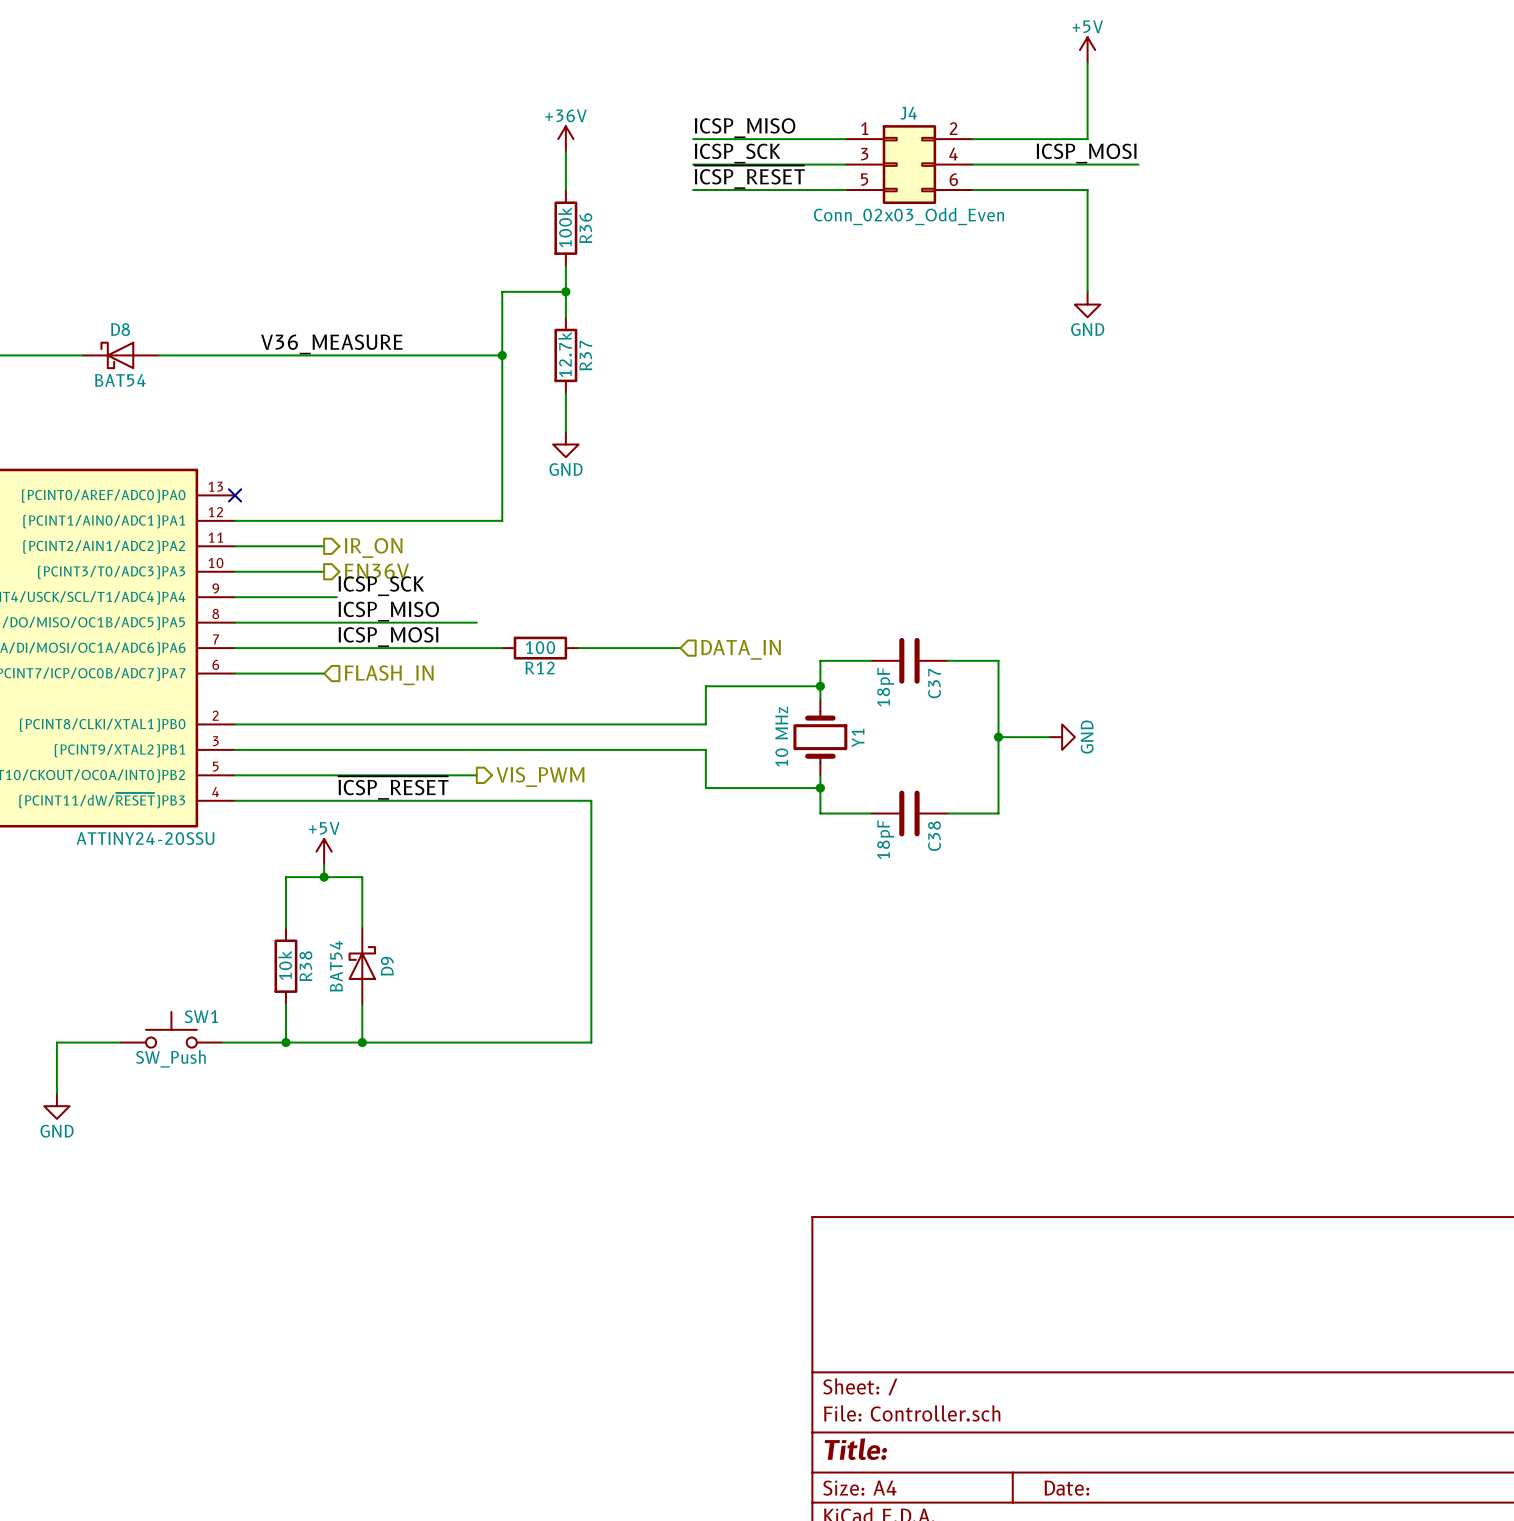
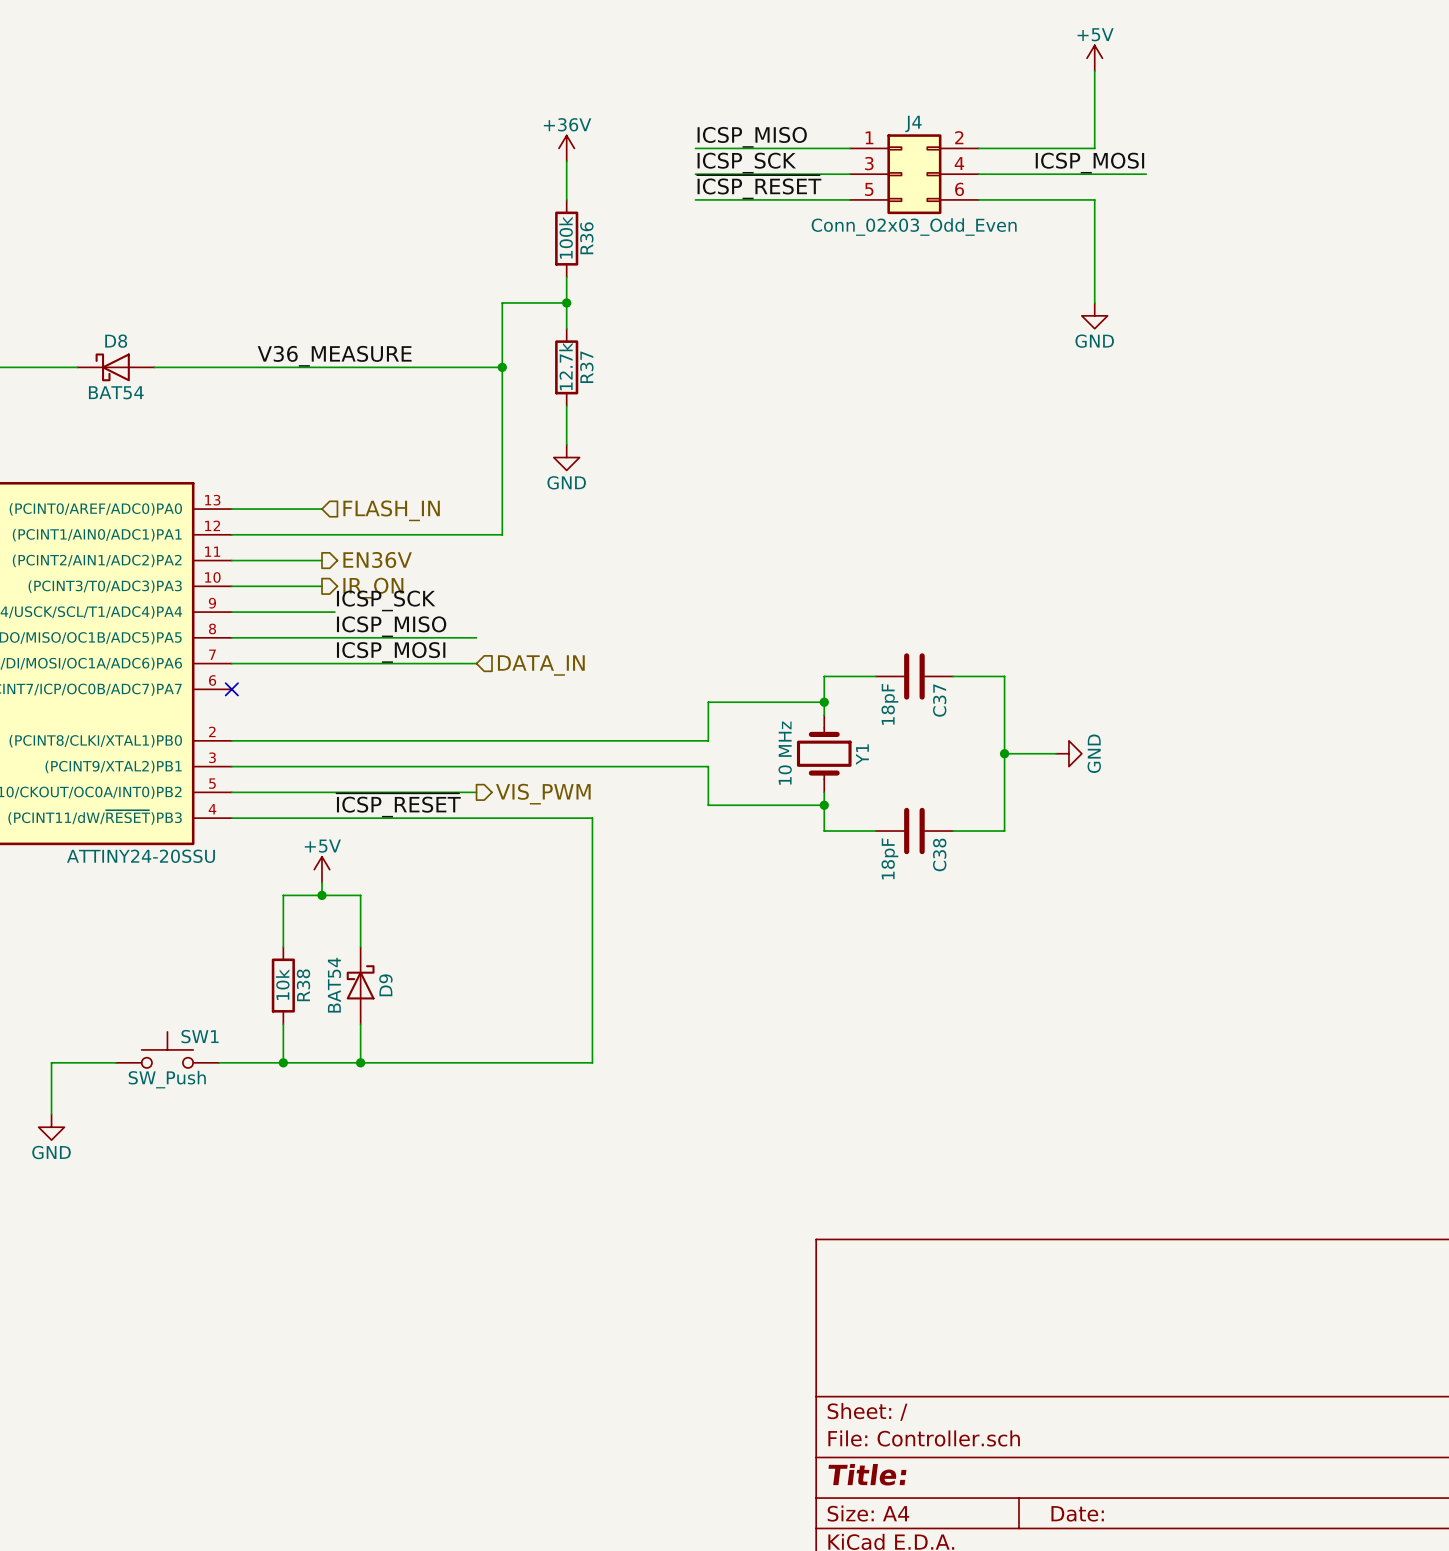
no-connect mark: (235, 495) -> none
hierarchical label: IR_ON (373, 548) -> EN36V (377, 559)
hierarchical label: EN36V (376, 571) -> IR_ON (373, 588)
wire: (476, 648) (502, 648) -> none
R12: 100 (540, 648) -> none
wire: (578, 648) (680, 648) -> none
hierarchical label position: DATA_IN (741, 649) -> DATA_IN (541, 665)
wire: (235, 673) (324, 673) -> (231, 509) (321, 509)
no-connect mark: none -> (231, 689)
hierarchical label position: FLASH_IN (389, 675) -> FLASH_IN (391, 510)

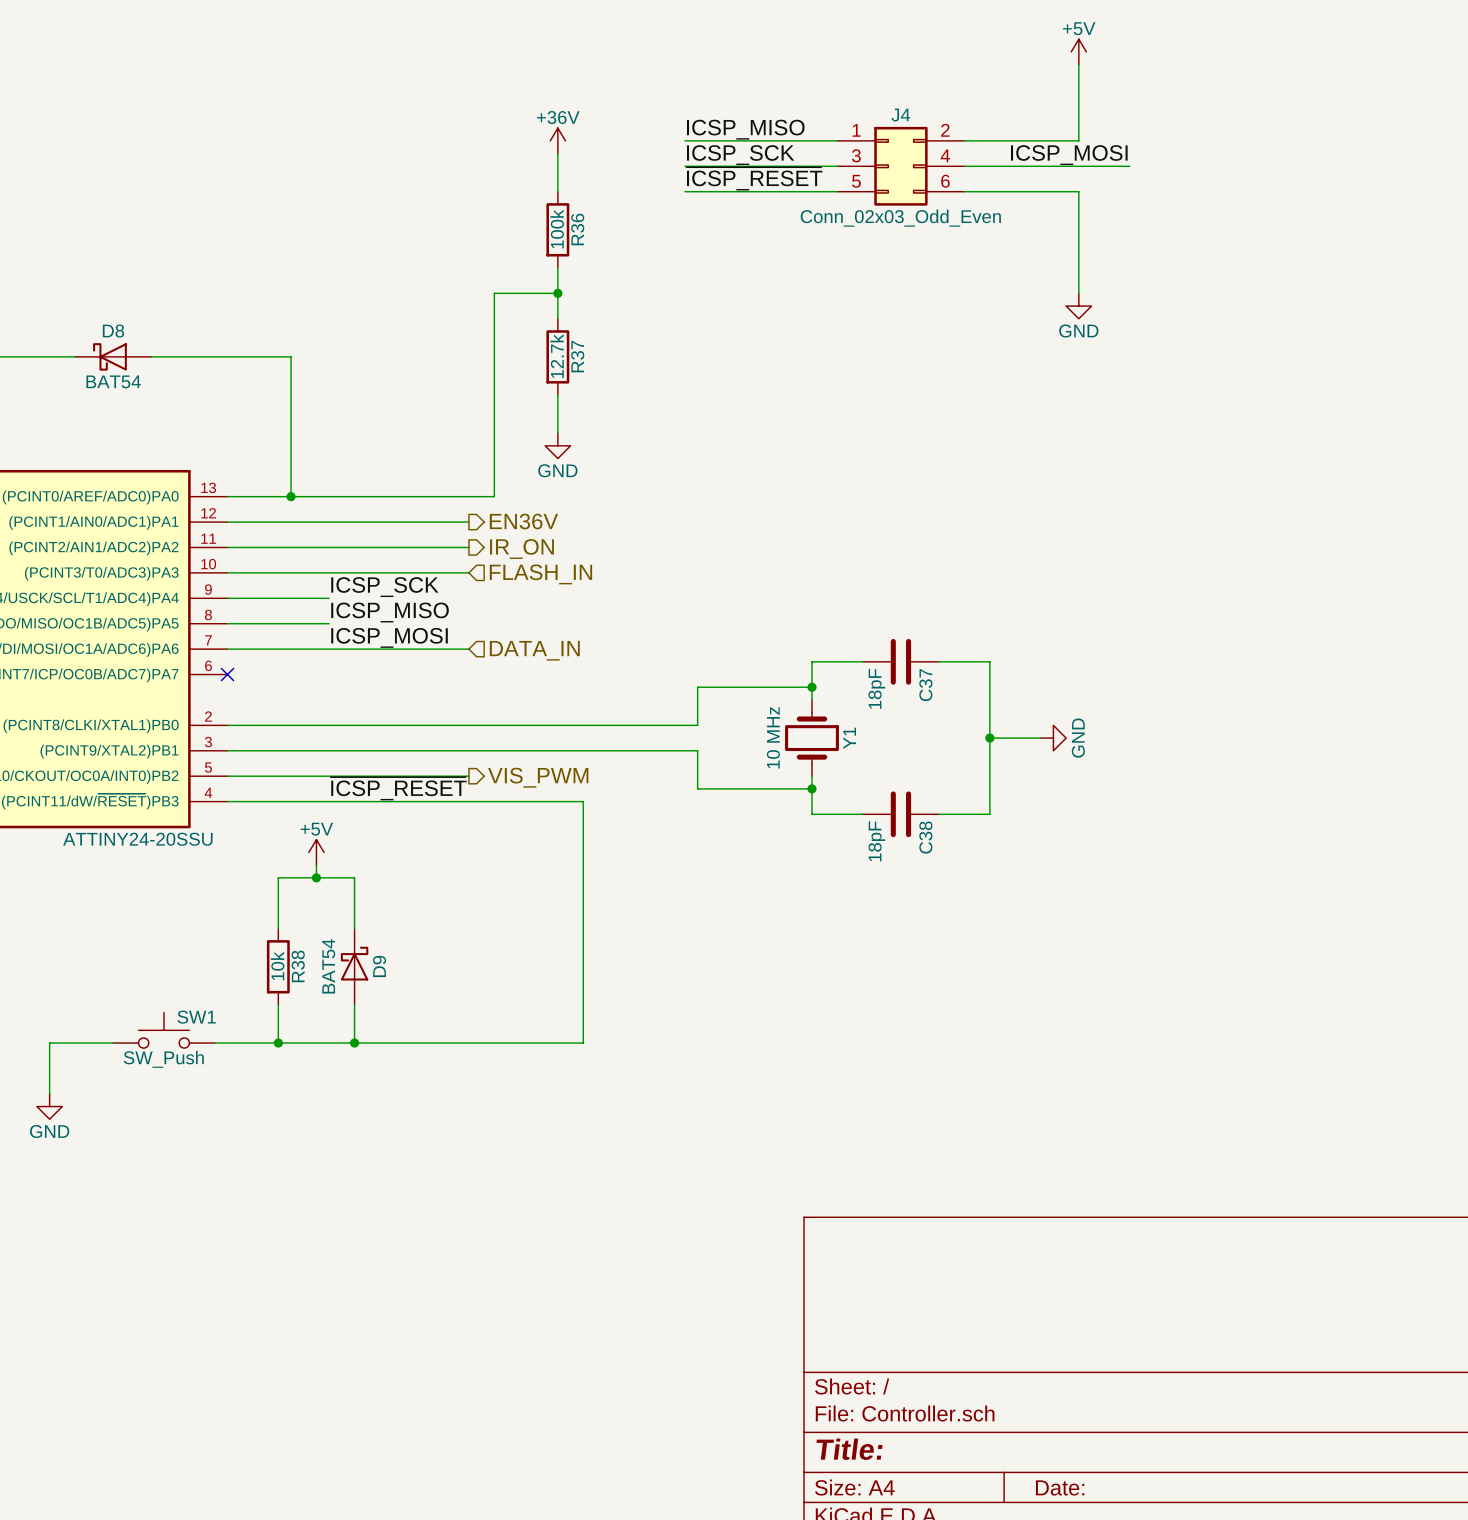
label: V36_MEASURE (334, 356) -> none
wire: (296, 367) (502, 367) -> (291, 356) (291, 496)
junction: (502, 367) -> none
junction: none -> (291, 496)
wire: (502, 509) (502, 534) (476, 534) -> (494, 496) (316, 496)
hierarchical label position: FLASH_IN (391, 510) -> FLASH_IN (540, 574)
hierarchical label position: EN36V (377, 559) -> EN36V (523, 521)
wire: none -> (316, 547) (468, 547)
wire: none -> (316, 572) (468, 572)
hierarchical label position: IR_ON (373, 588) -> IR_ON (521, 549)
wire: (334, 637) (476, 637) -> none

